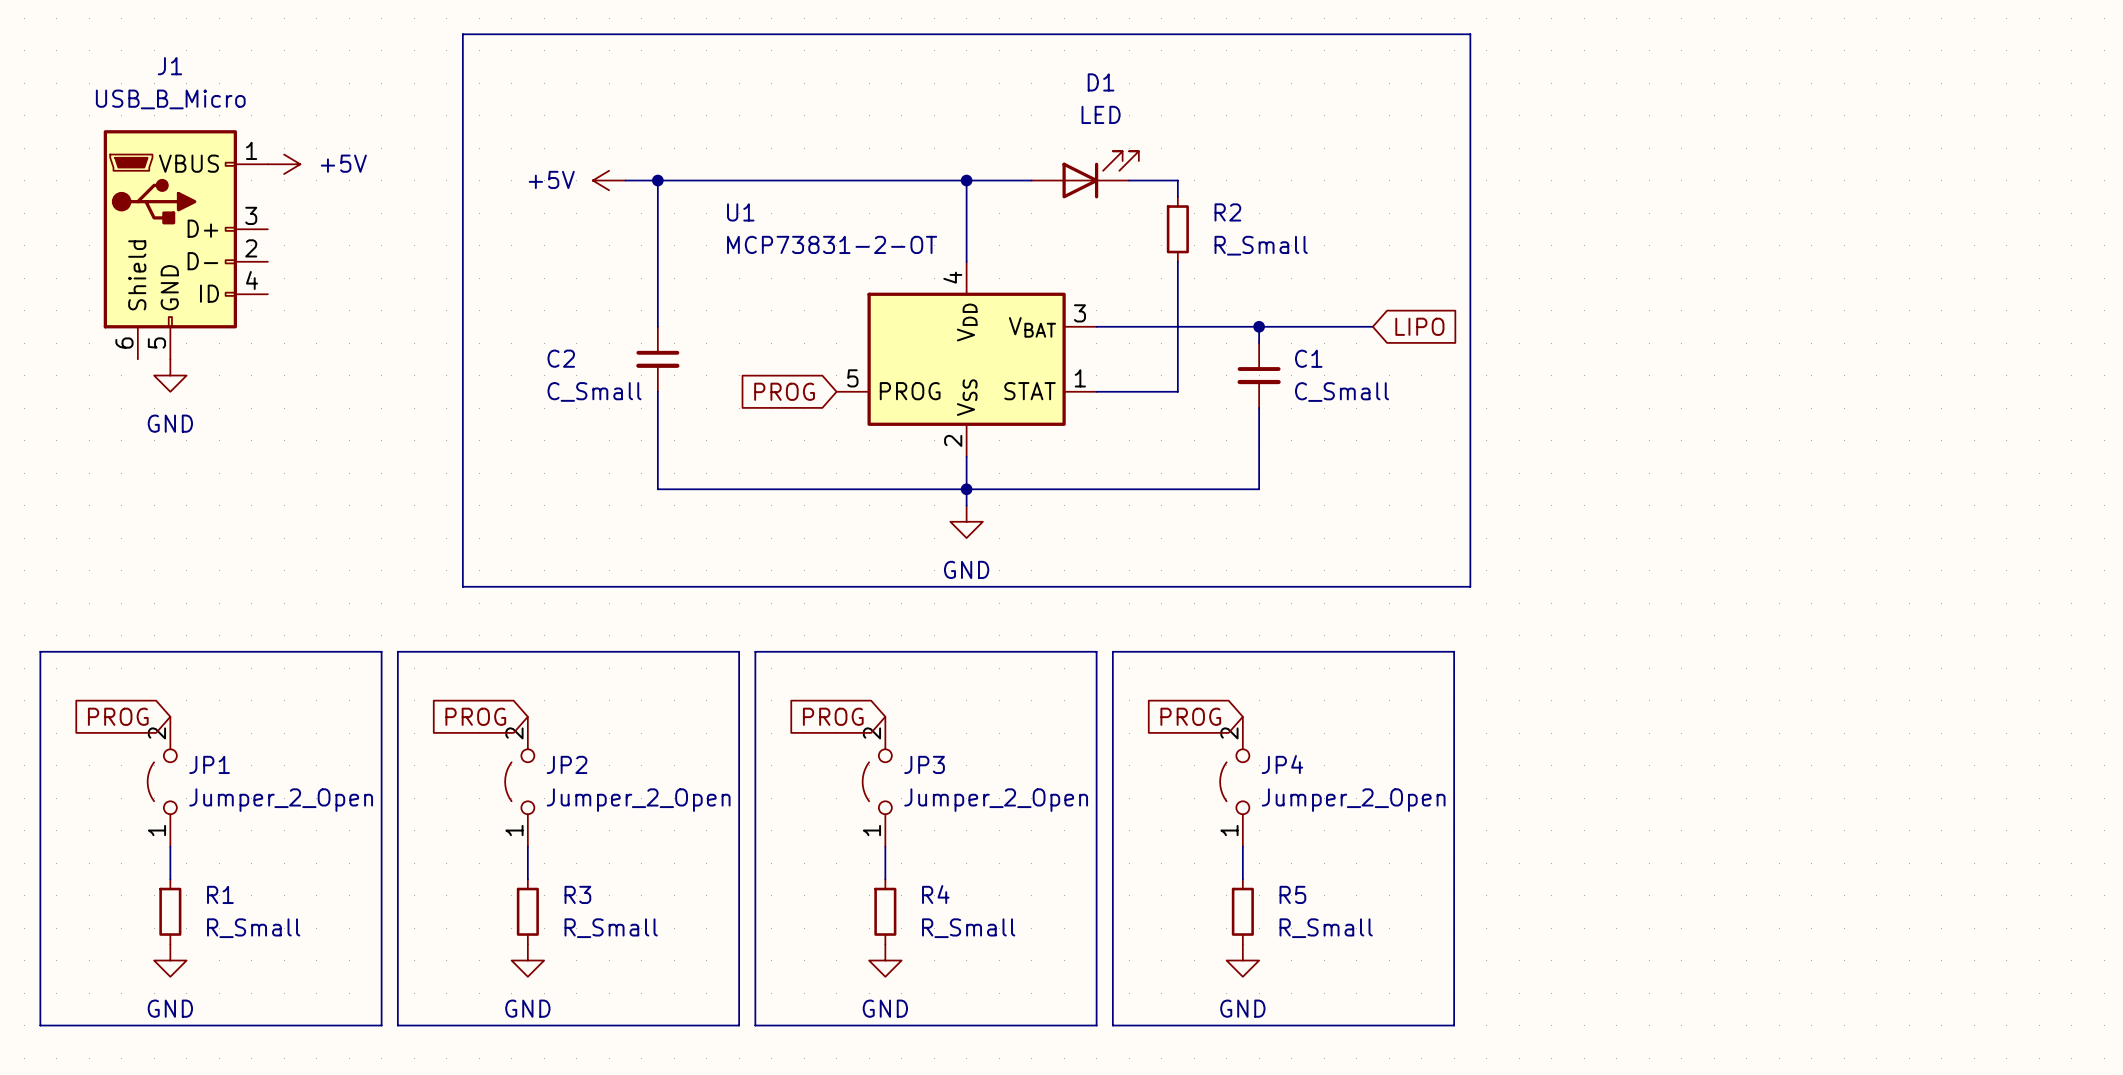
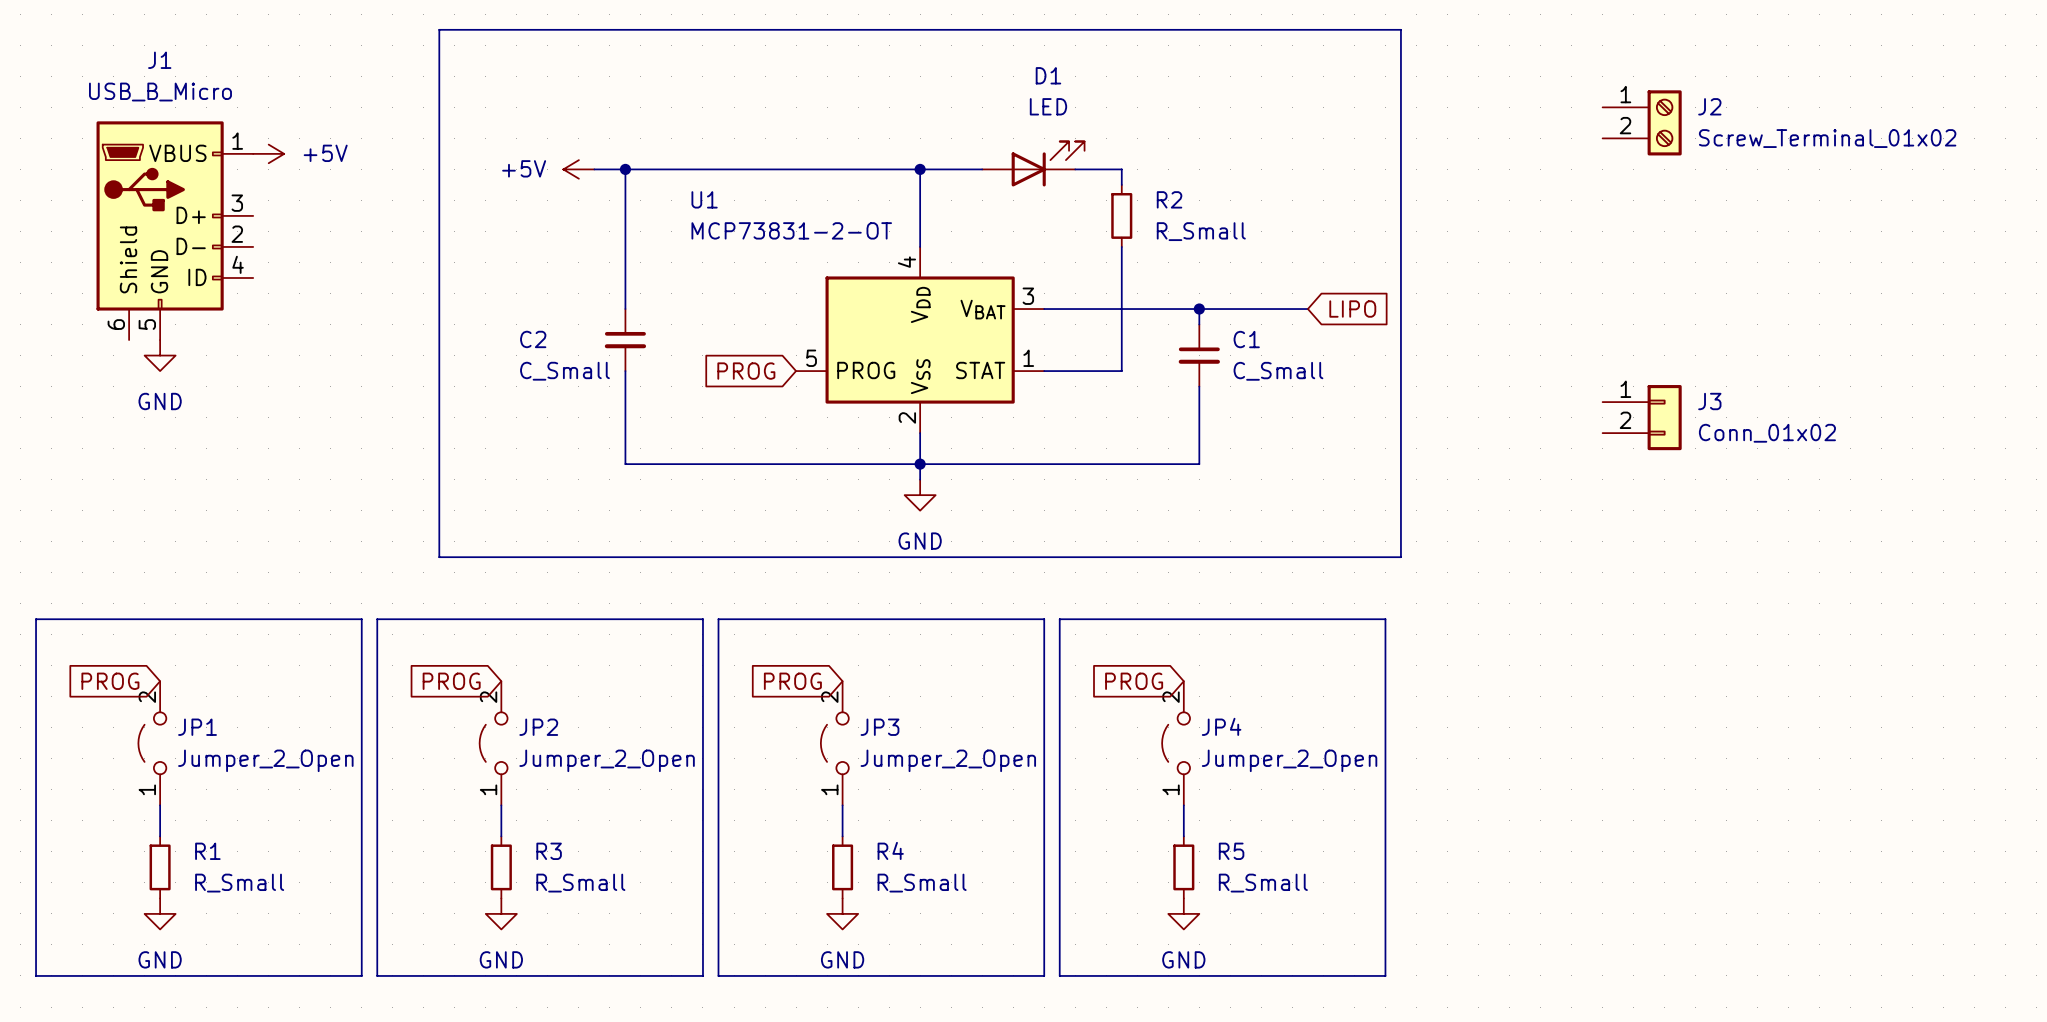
J2: none -> Screw_Terminal_01x02 (1642, 122)
J3: none -> Conn_01x02 (1642, 417)

